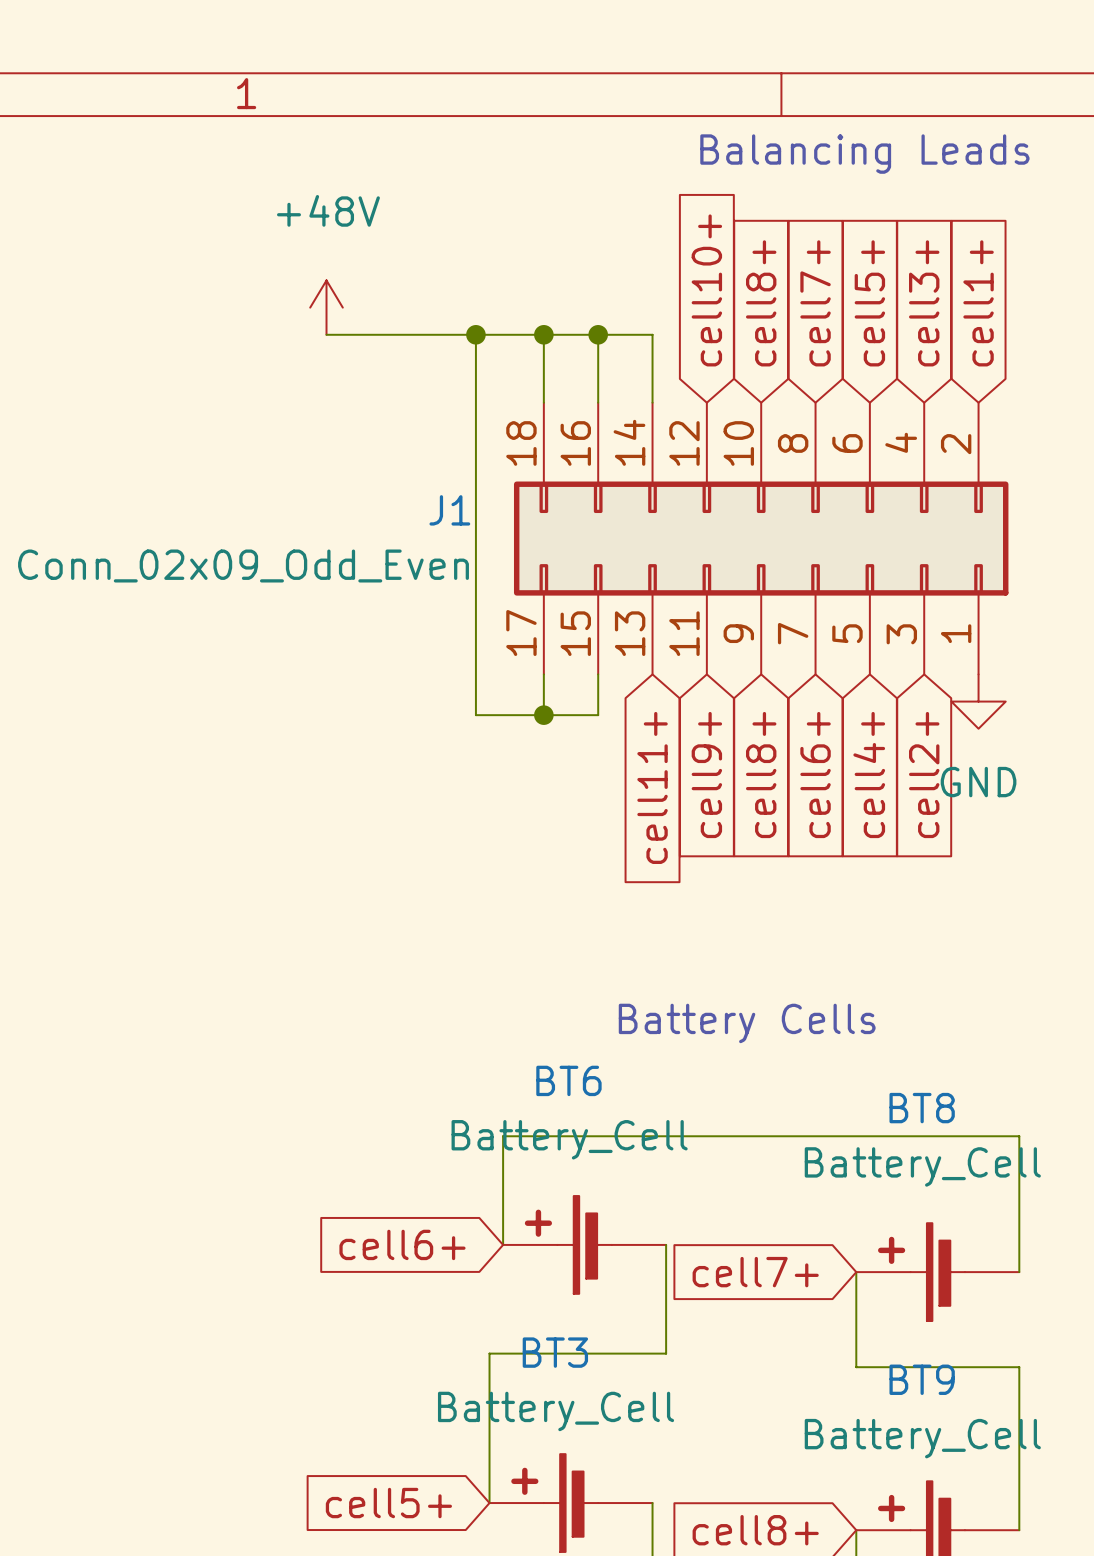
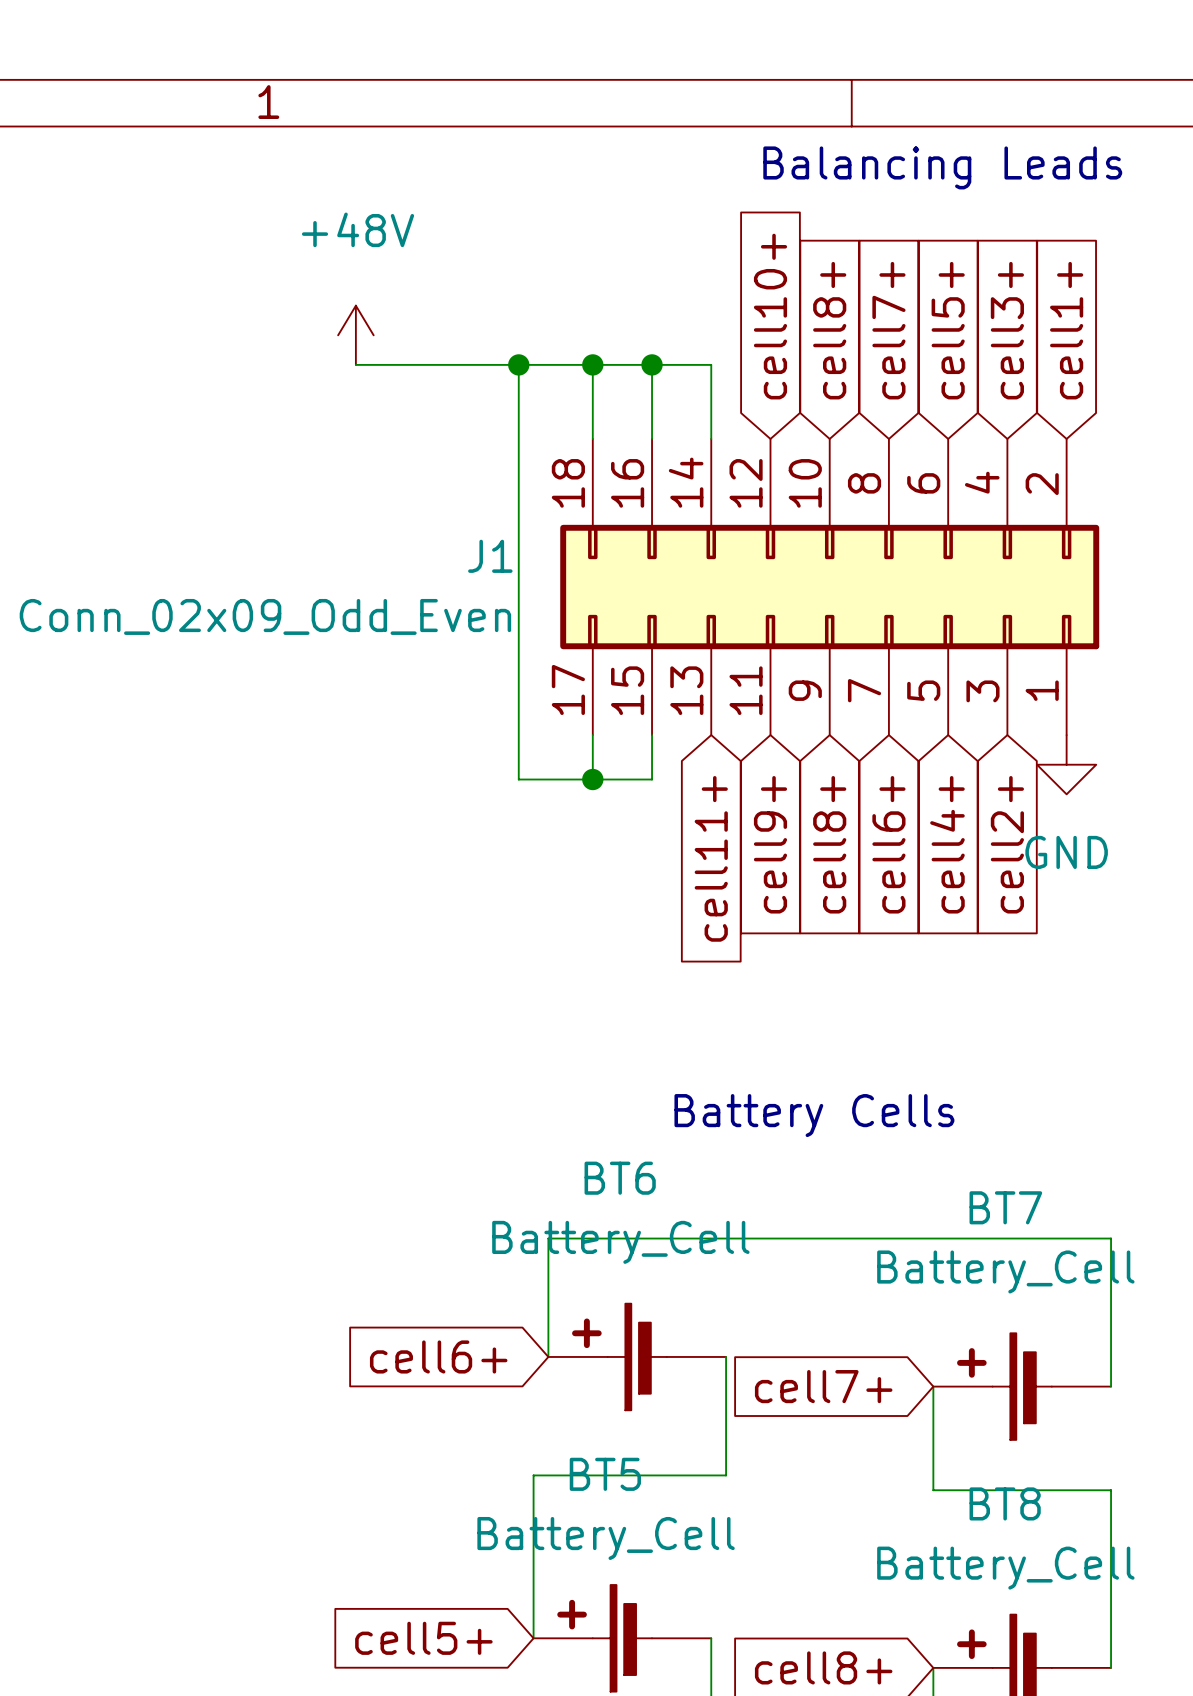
BT8 name: BT8 (922, 1108) -> BT7 (1005, 1207)
BT3 name: BT3 (555, 1352) -> BT5 (605, 1474)
BT9 name: BT9 (922, 1379) -> BT8 (1005, 1503)

